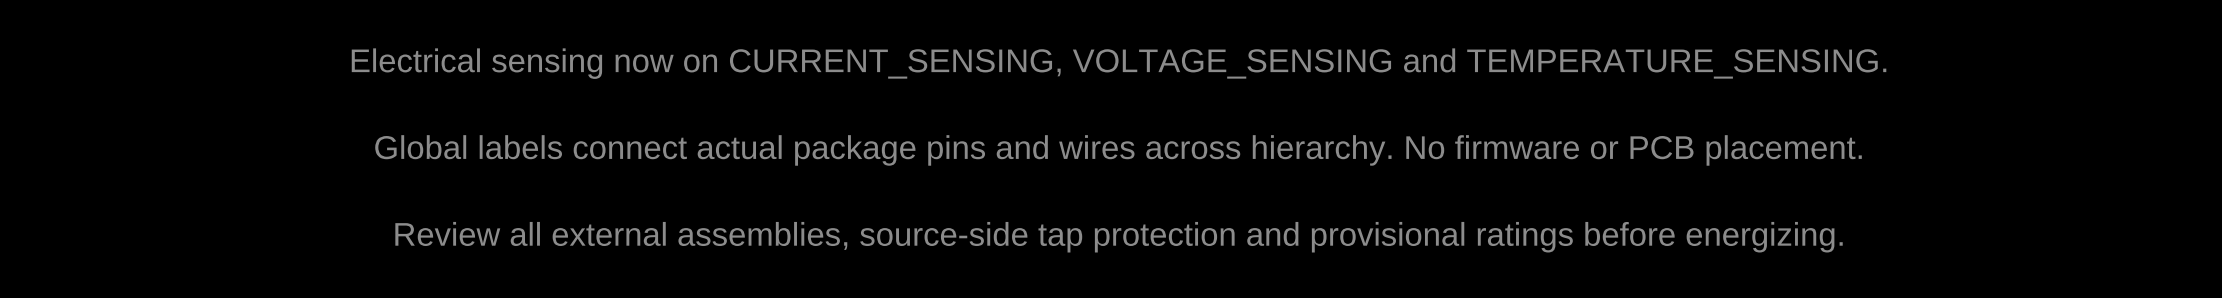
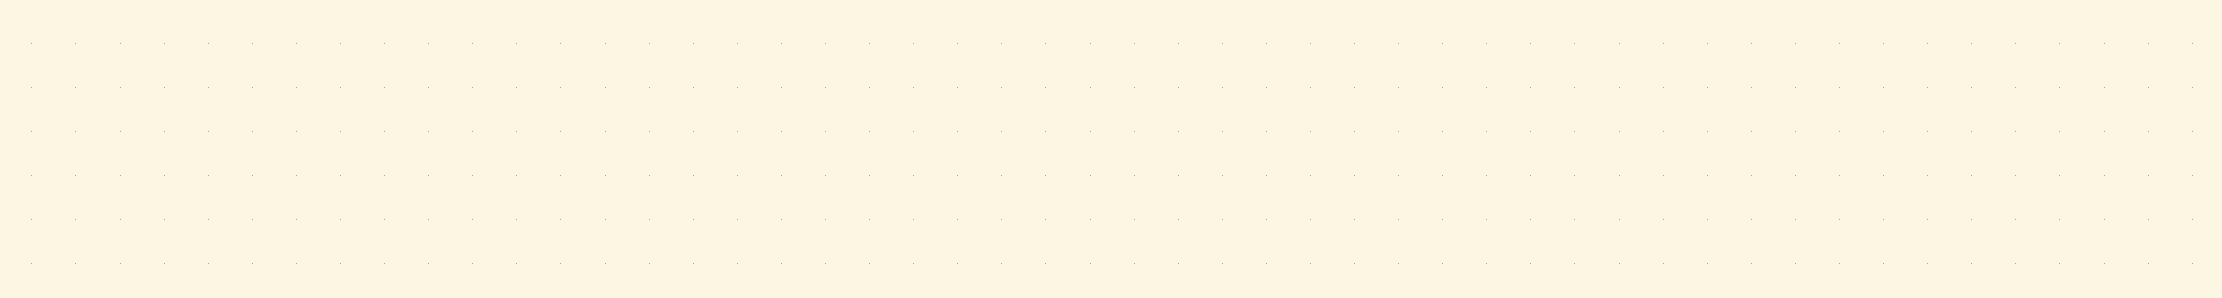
text: Electrical sensing now on CURRENT_SENSING, VOLTAGE_SENSING and TEMPERATURE_SENSING. (1119, 63) -> none
text: Global labels connect actual package pins and wires across hierarchy. No firmware or PCB placement. (1118, 150) -> none
text: Review all external assemblies, source-side tap protection and provisional ratings before energizing. (1119, 237) -> none

